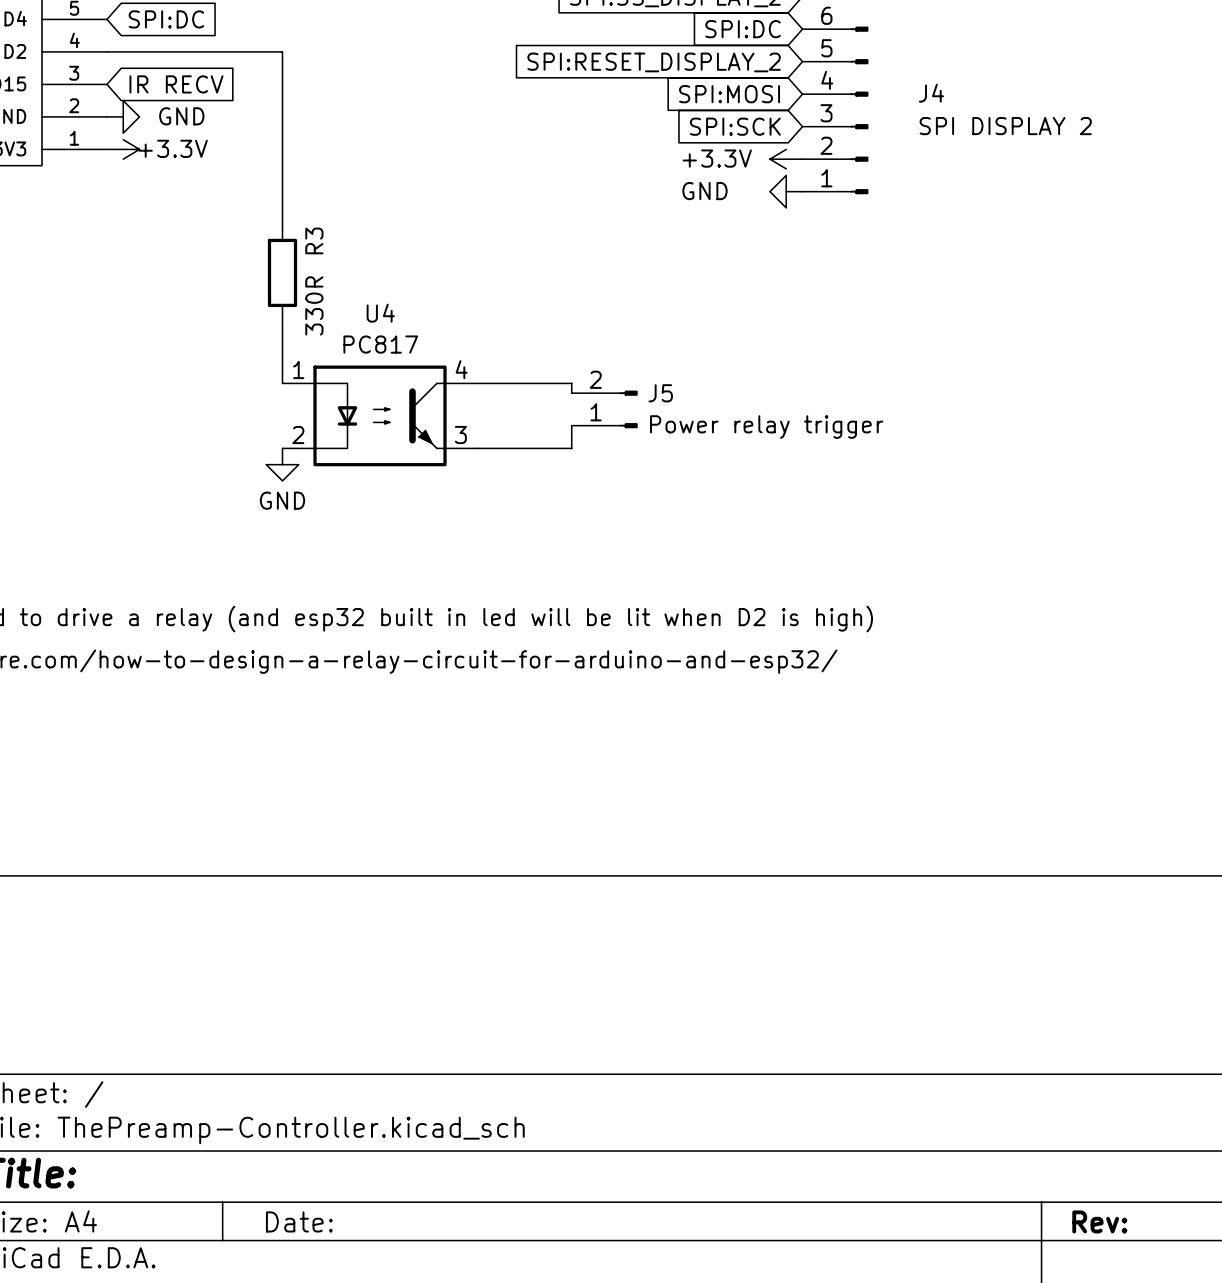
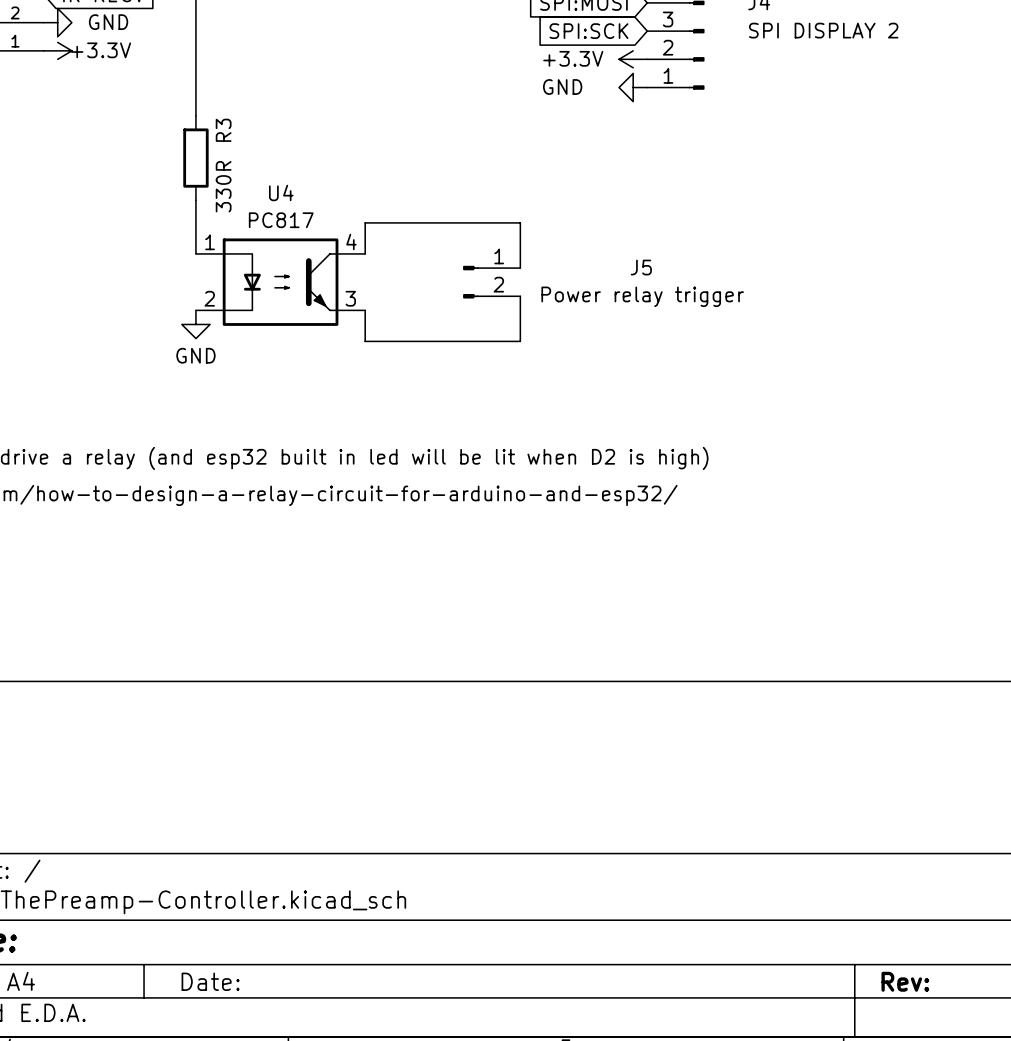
wire: (477, 383) (571, 383) (571, 393) -> (365, 253) (365, 222) (520, 222) (520, 268)
J5 name position: J5 (660, 393) -> J5 (641, 267)
J5 rotation: 0° (628, 409) -> 180° (470, 282)
wire: (571, 425) (571, 448) (477, 448) -> (520, 296) (520, 341) (365, 341) (365, 310)

